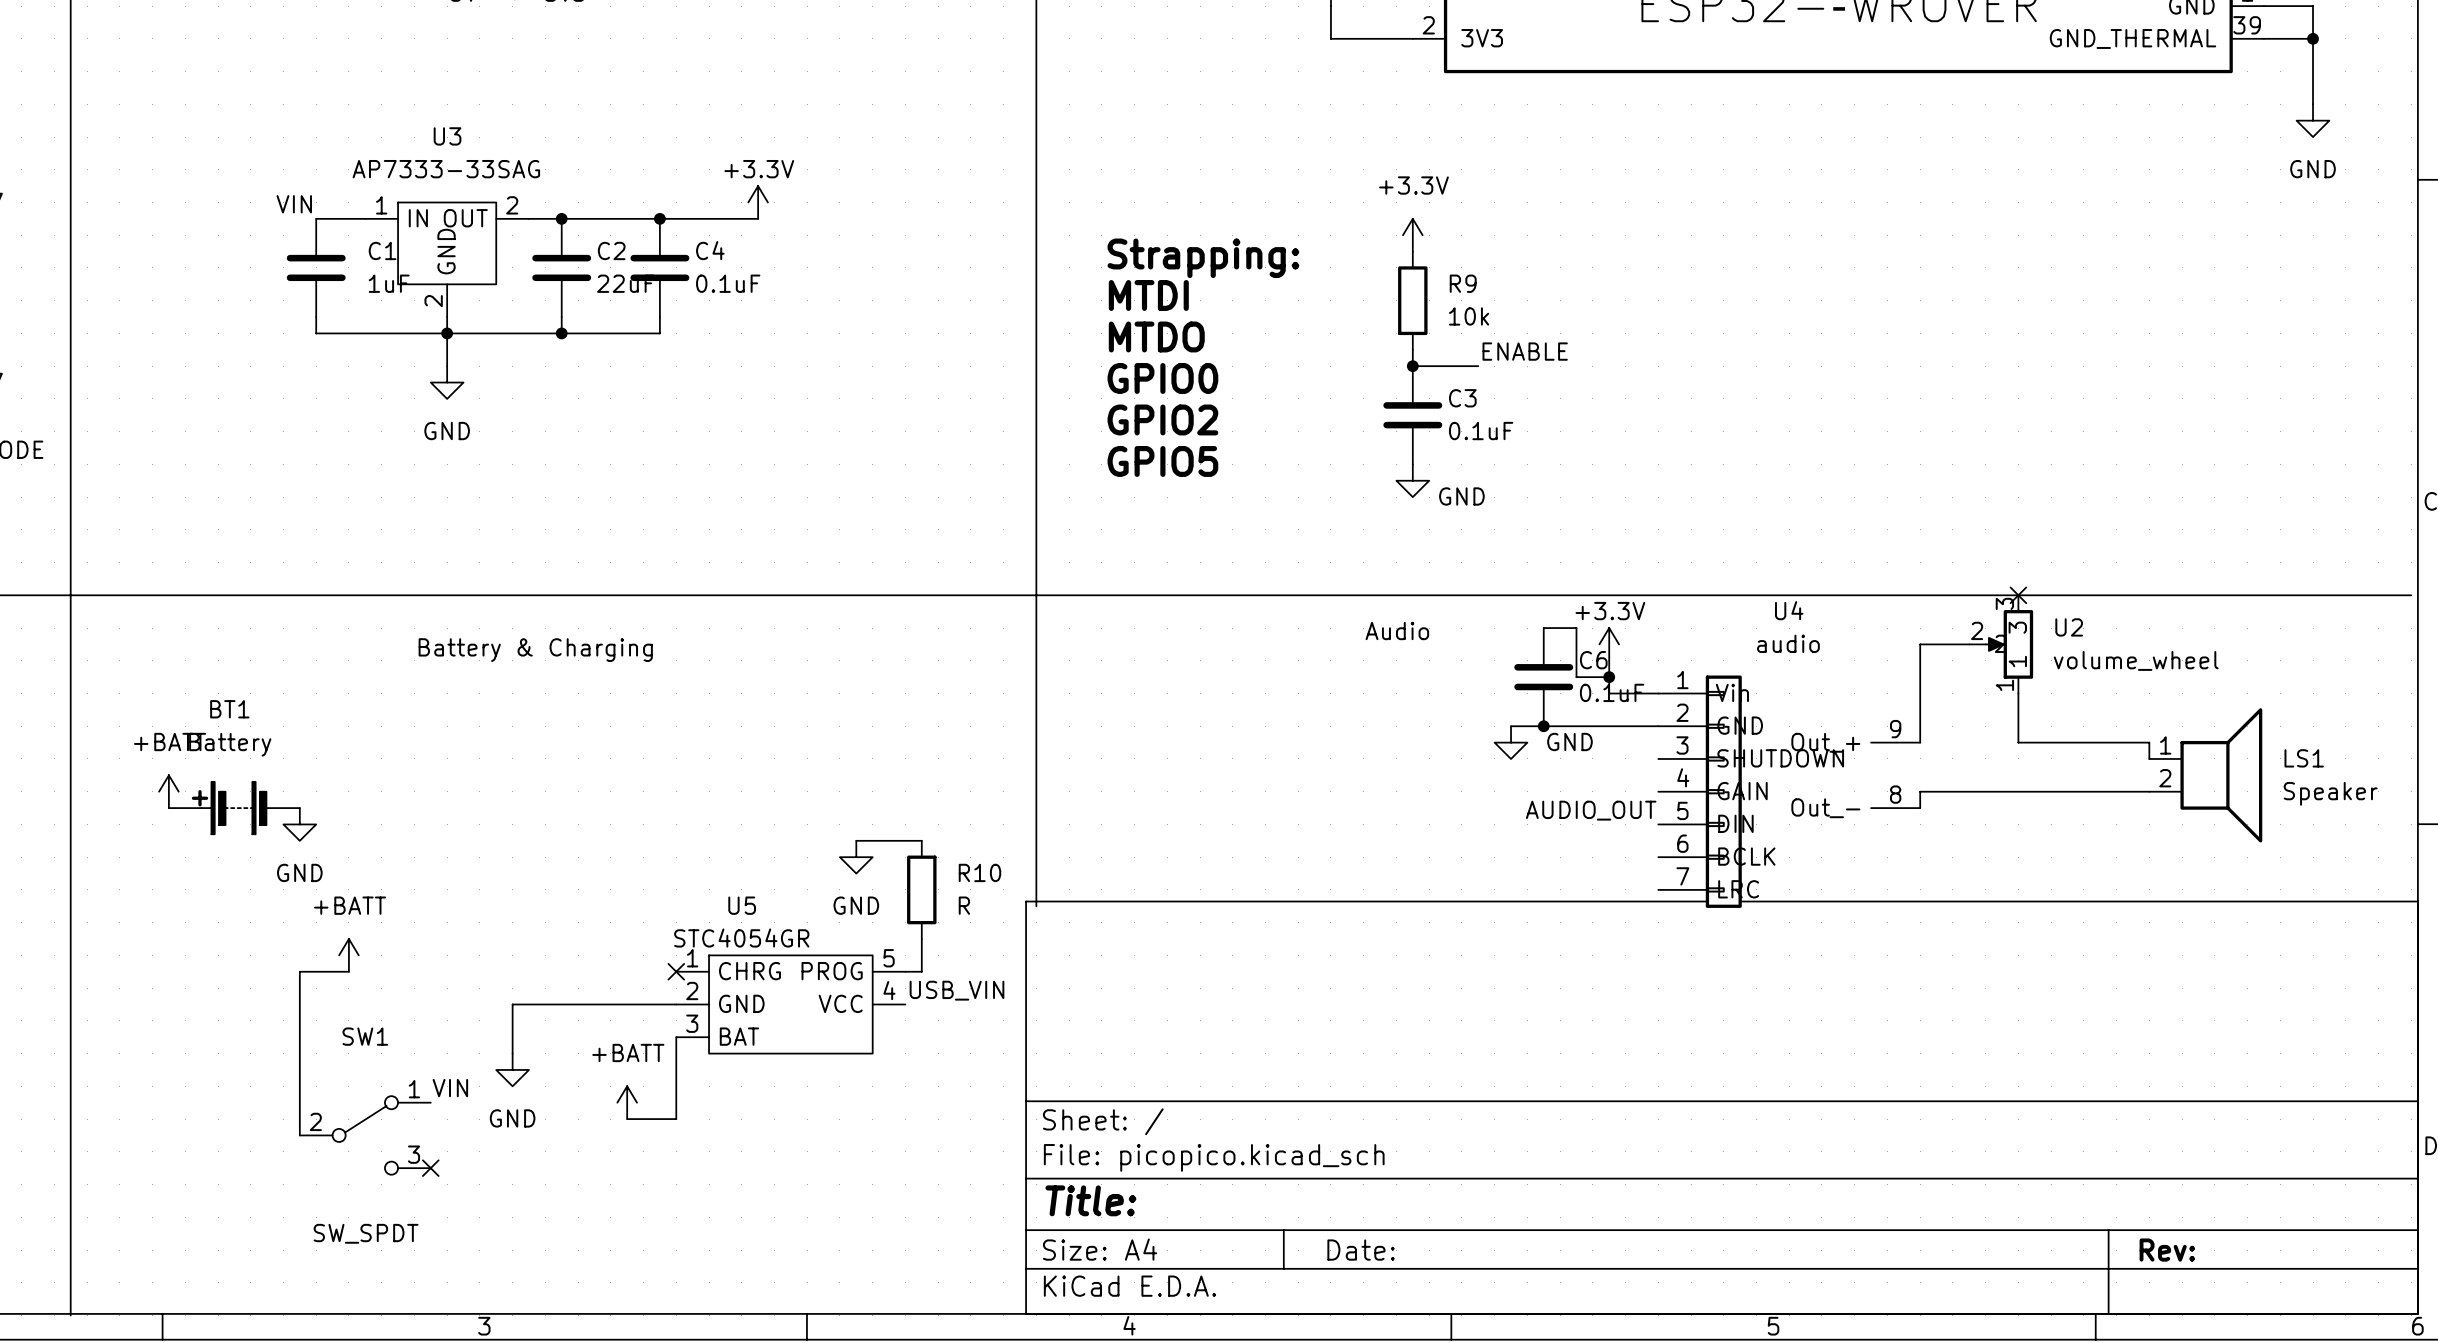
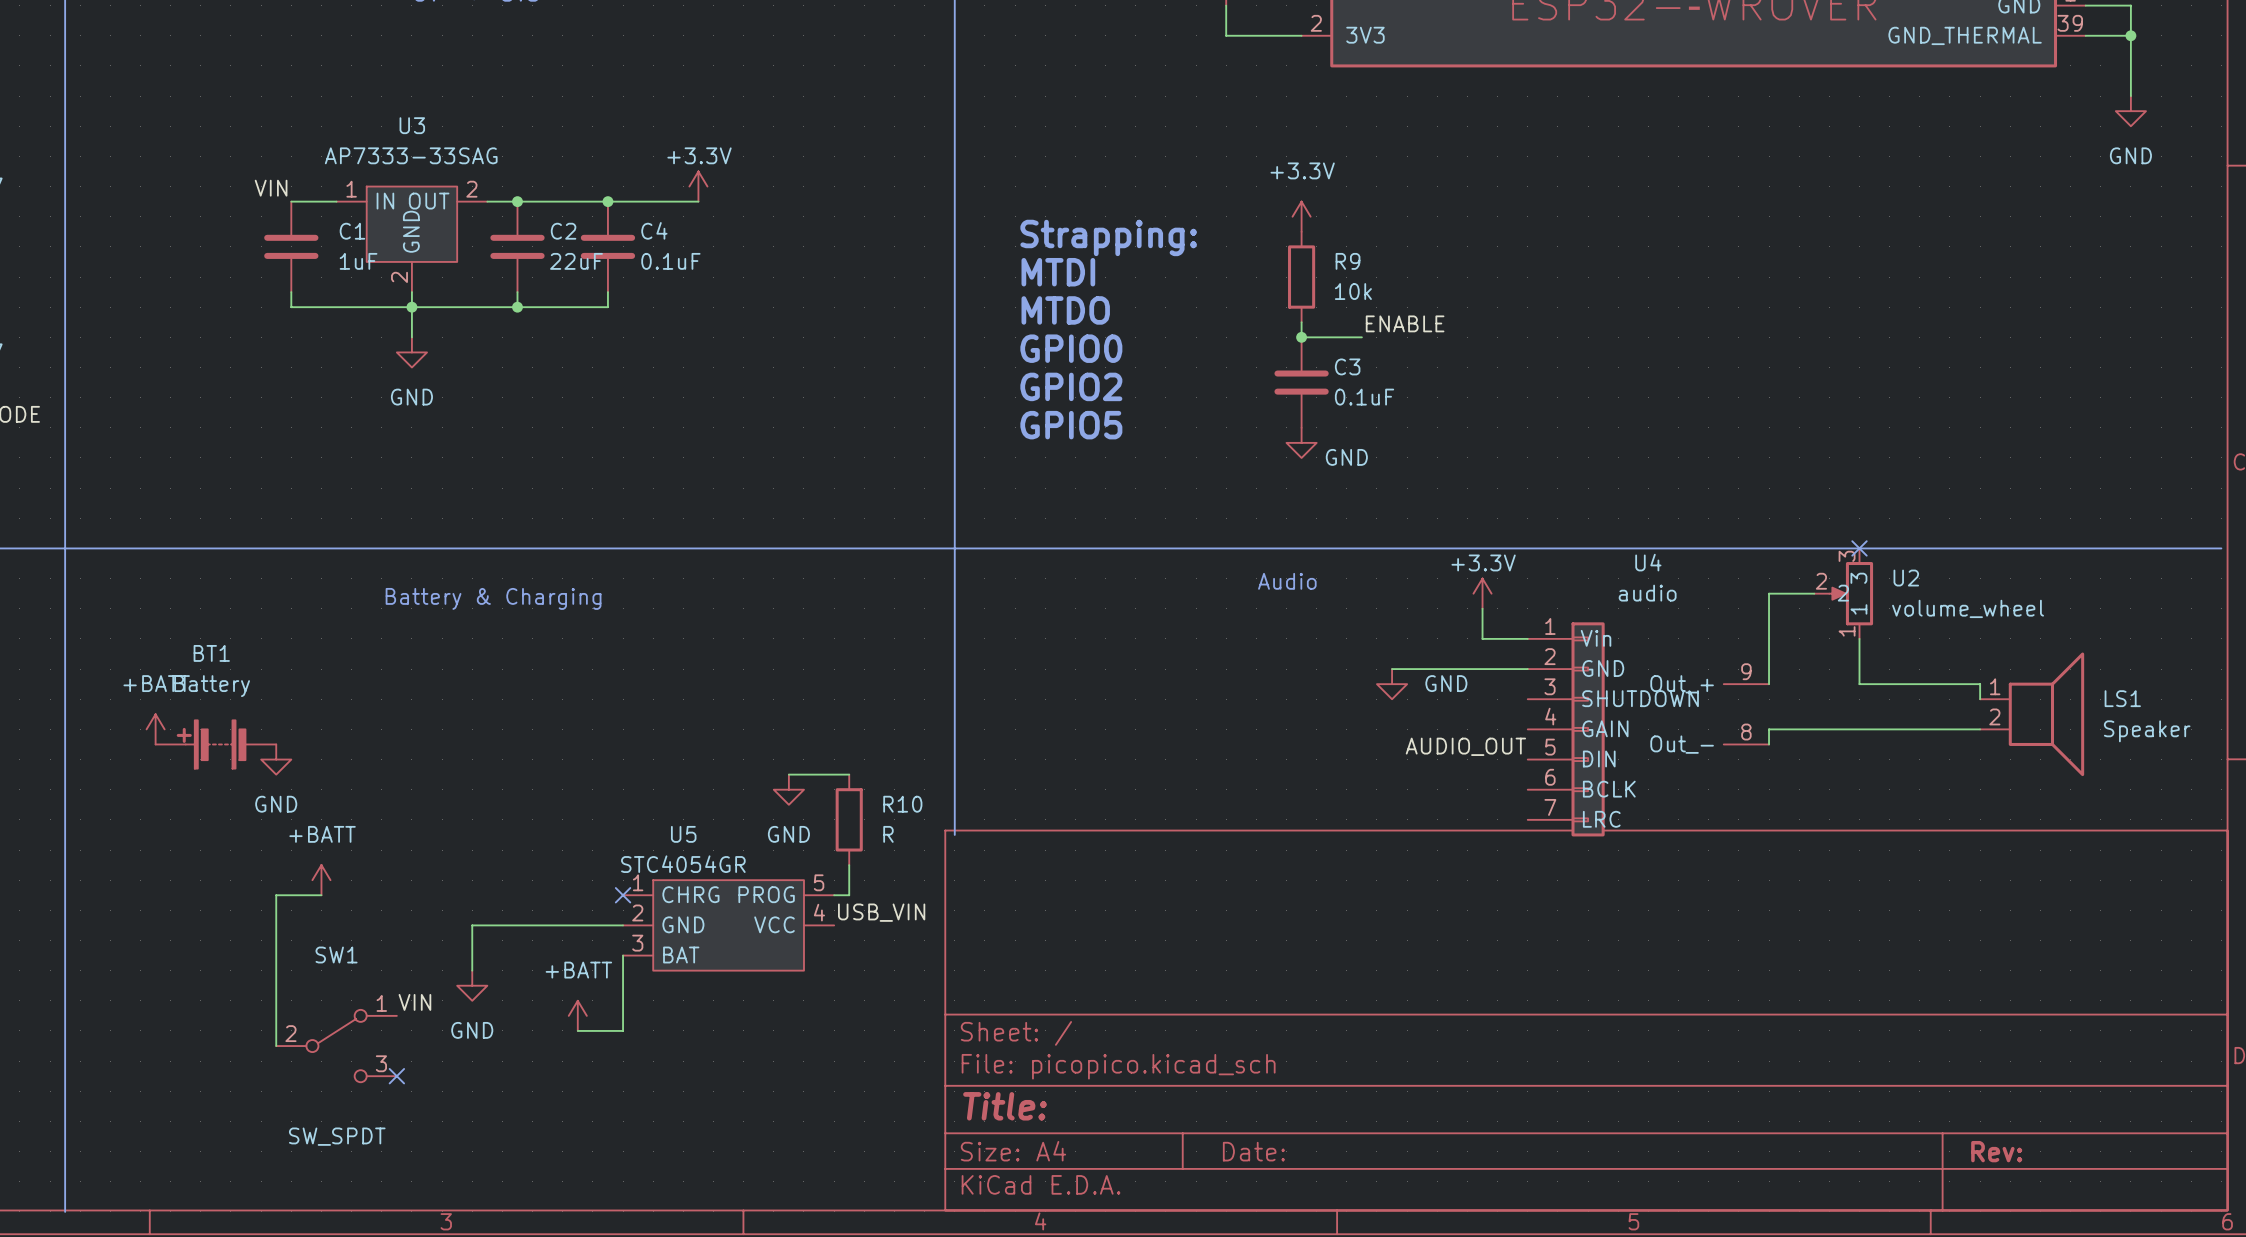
wire: (1543, 628) (1576, 628) (1576, 677) (1609, 677) -> none
C6: 0.1uF (1543, 677) -> none
junction: (1609, 677) -> none
junction: (1543, 726) -> none

